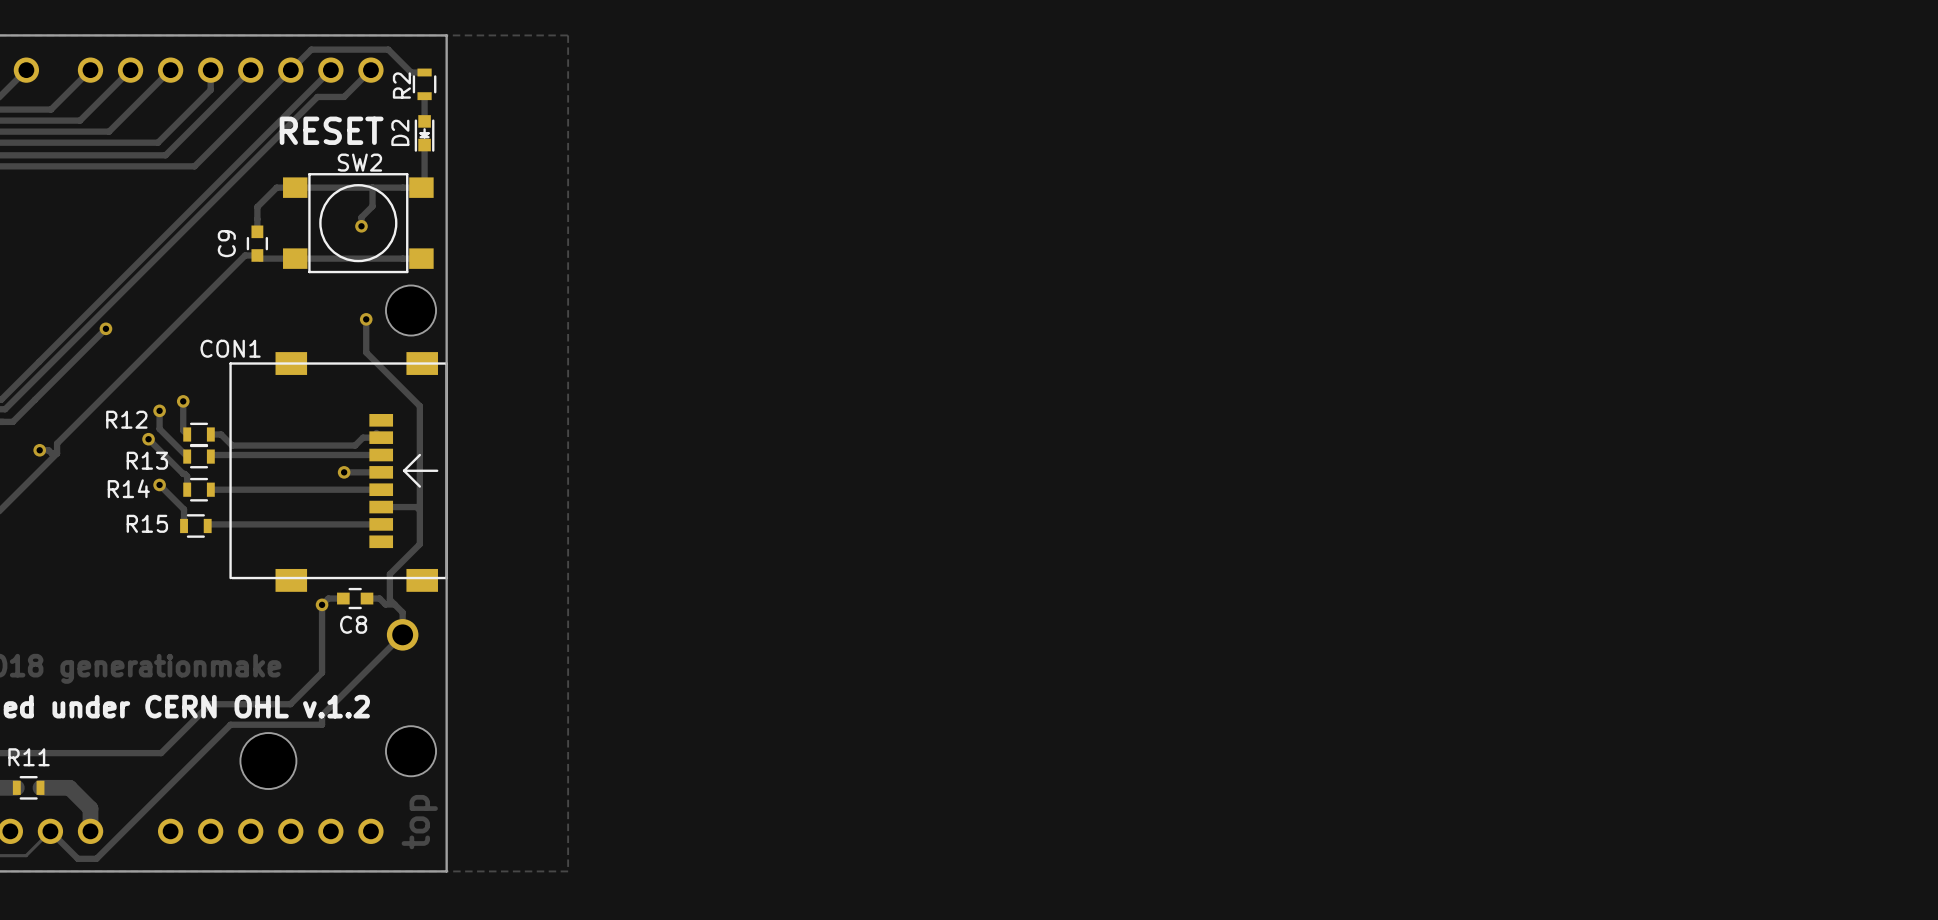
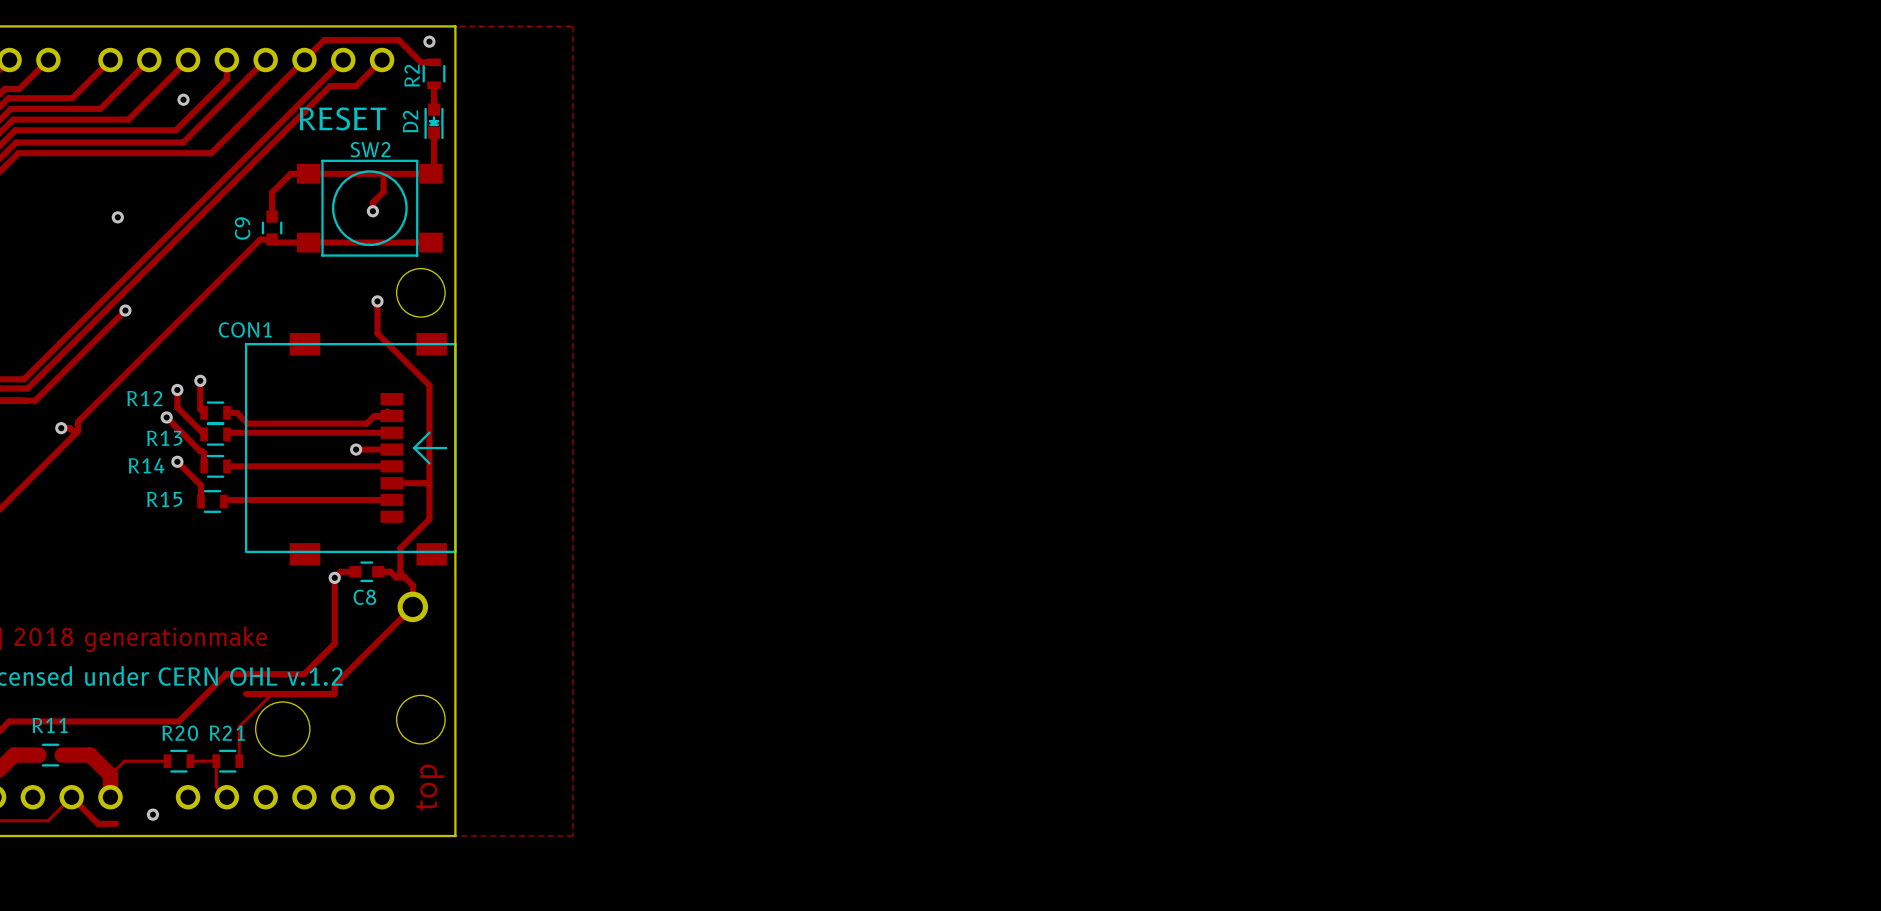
via: none -> (429, 41)
via: none -> (183, 99)
via: none -> (117, 217)
track: (230, 724) (96, 858) -> none
track: none -> (272, 693) (239, 726) (239, 761)
track: none -> (167, 761) (124, 761) (110, 775)
R20: none -> (178, 761)
track: none -> (190, 761) (216, 761) (216, 786) (226, 797)
R21: none -> (227, 761)
via: none -> (152, 814)

